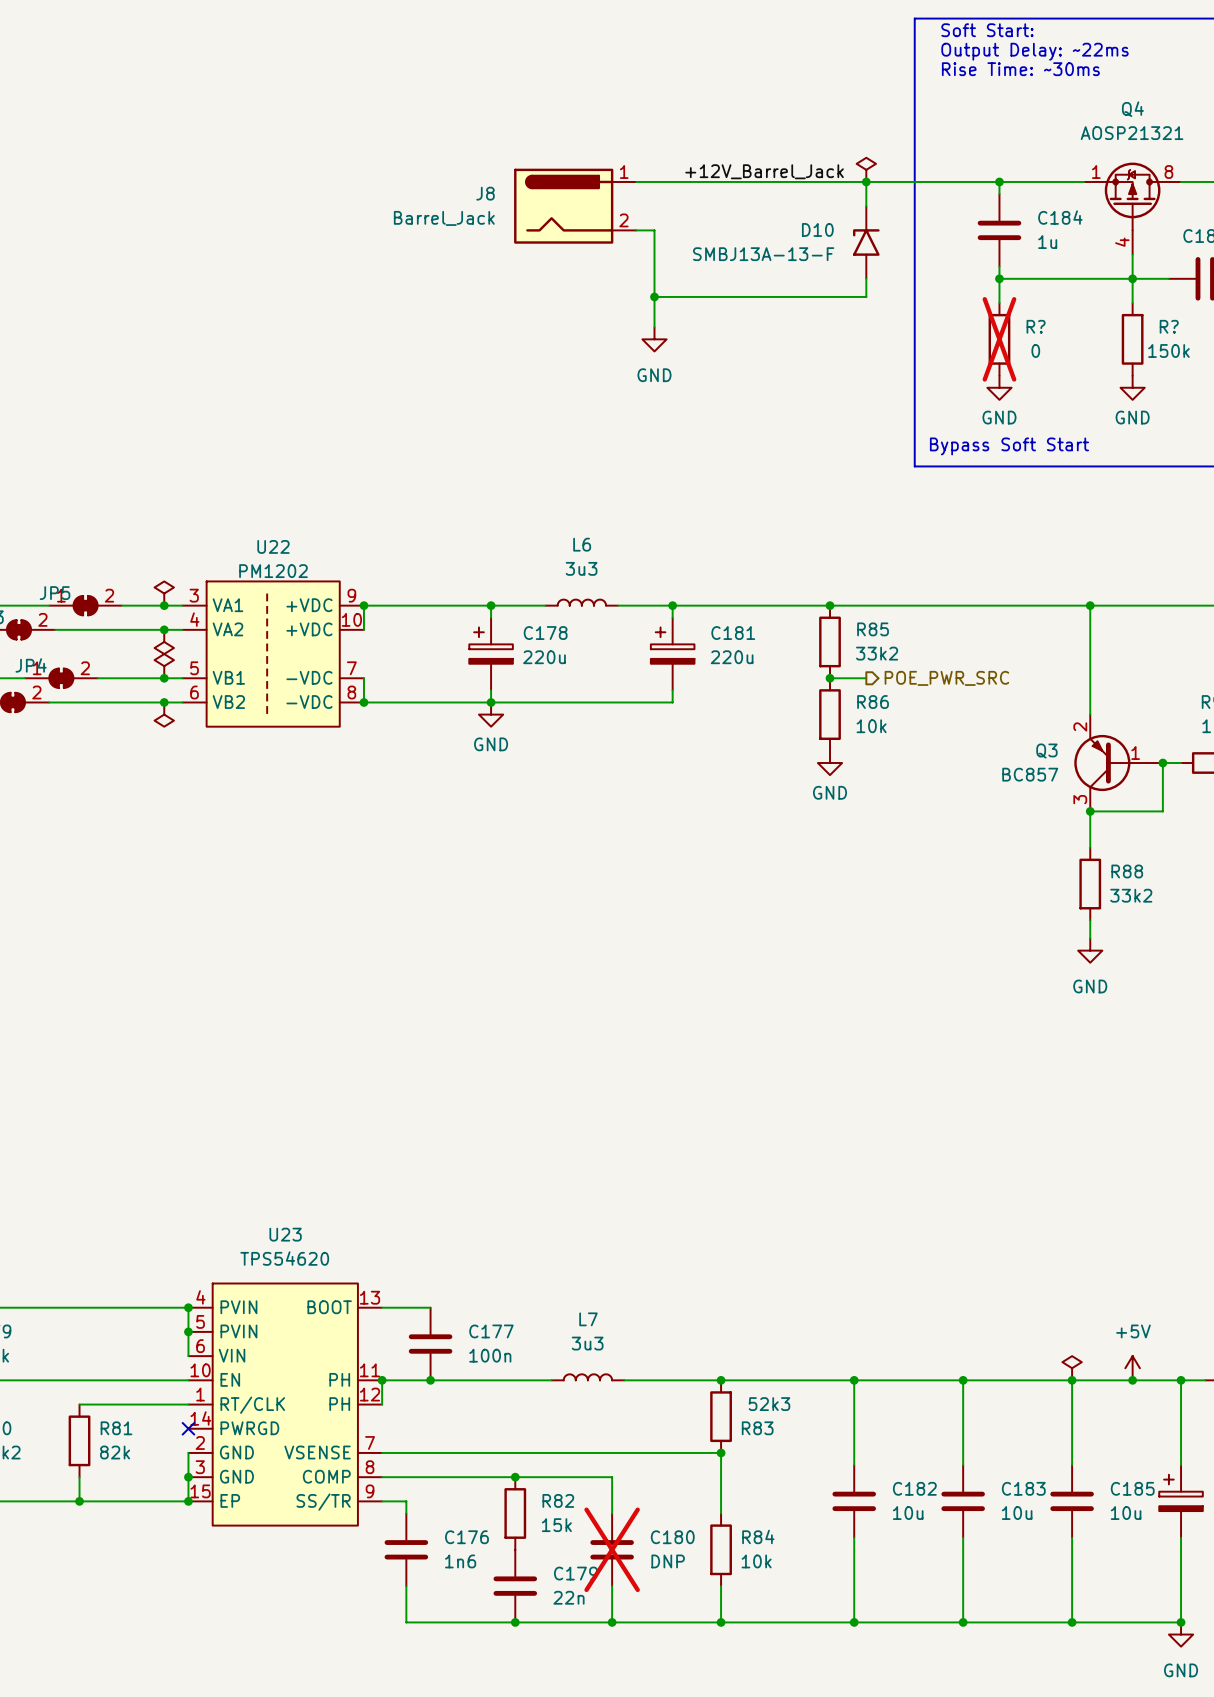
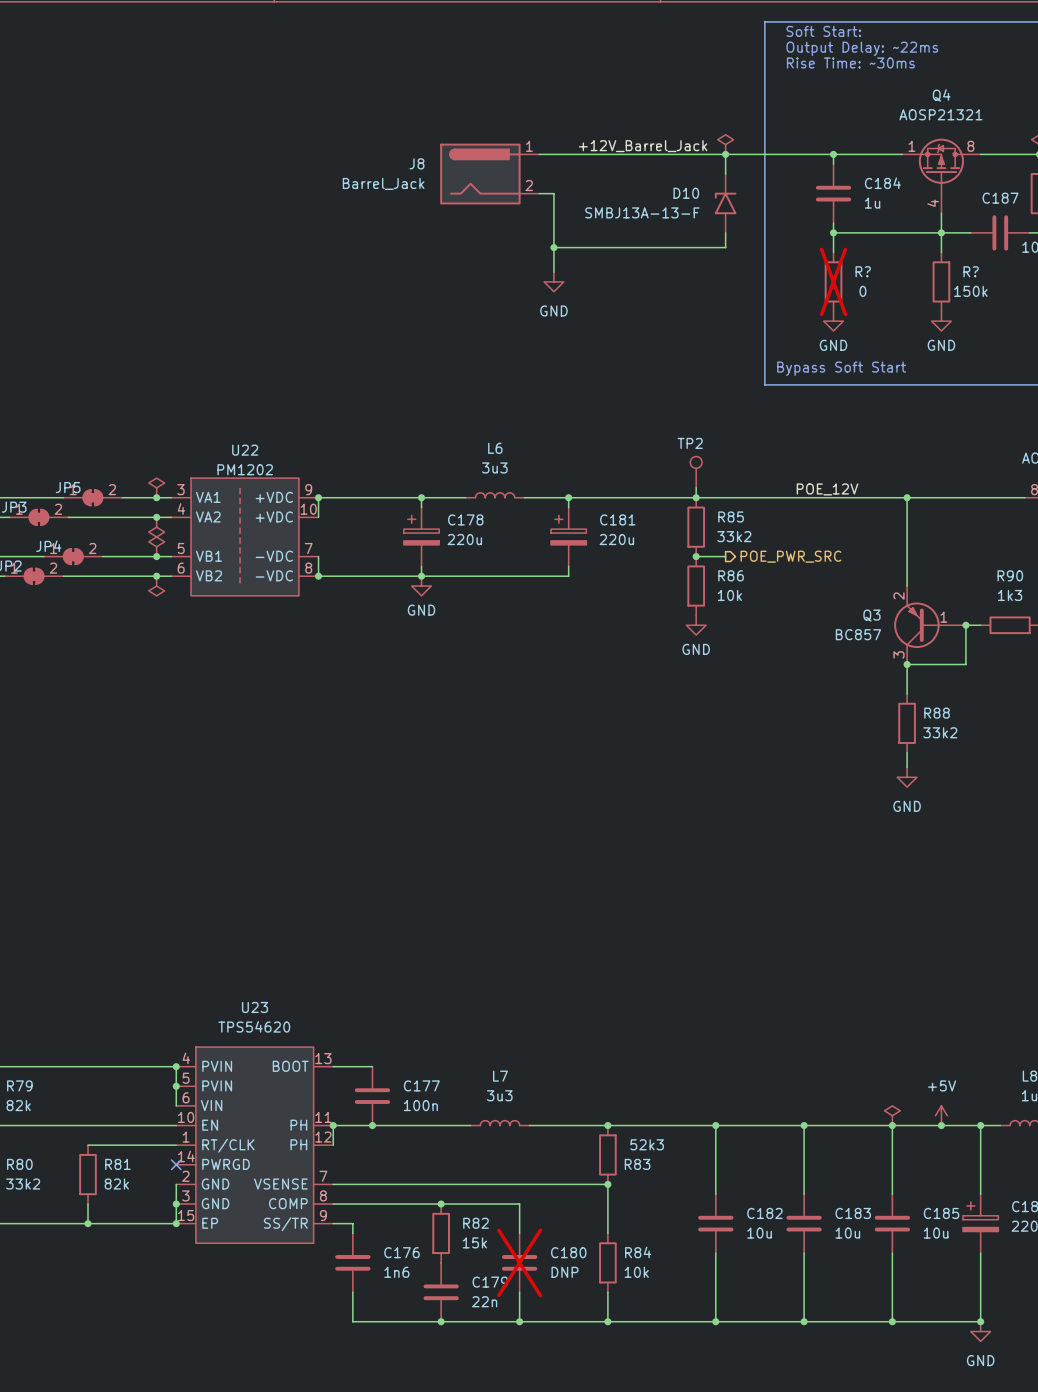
TP2: none -> (696, 472)
wire: none -> (696, 487) (696, 497)
label: none -> POE_12V (827, 489)

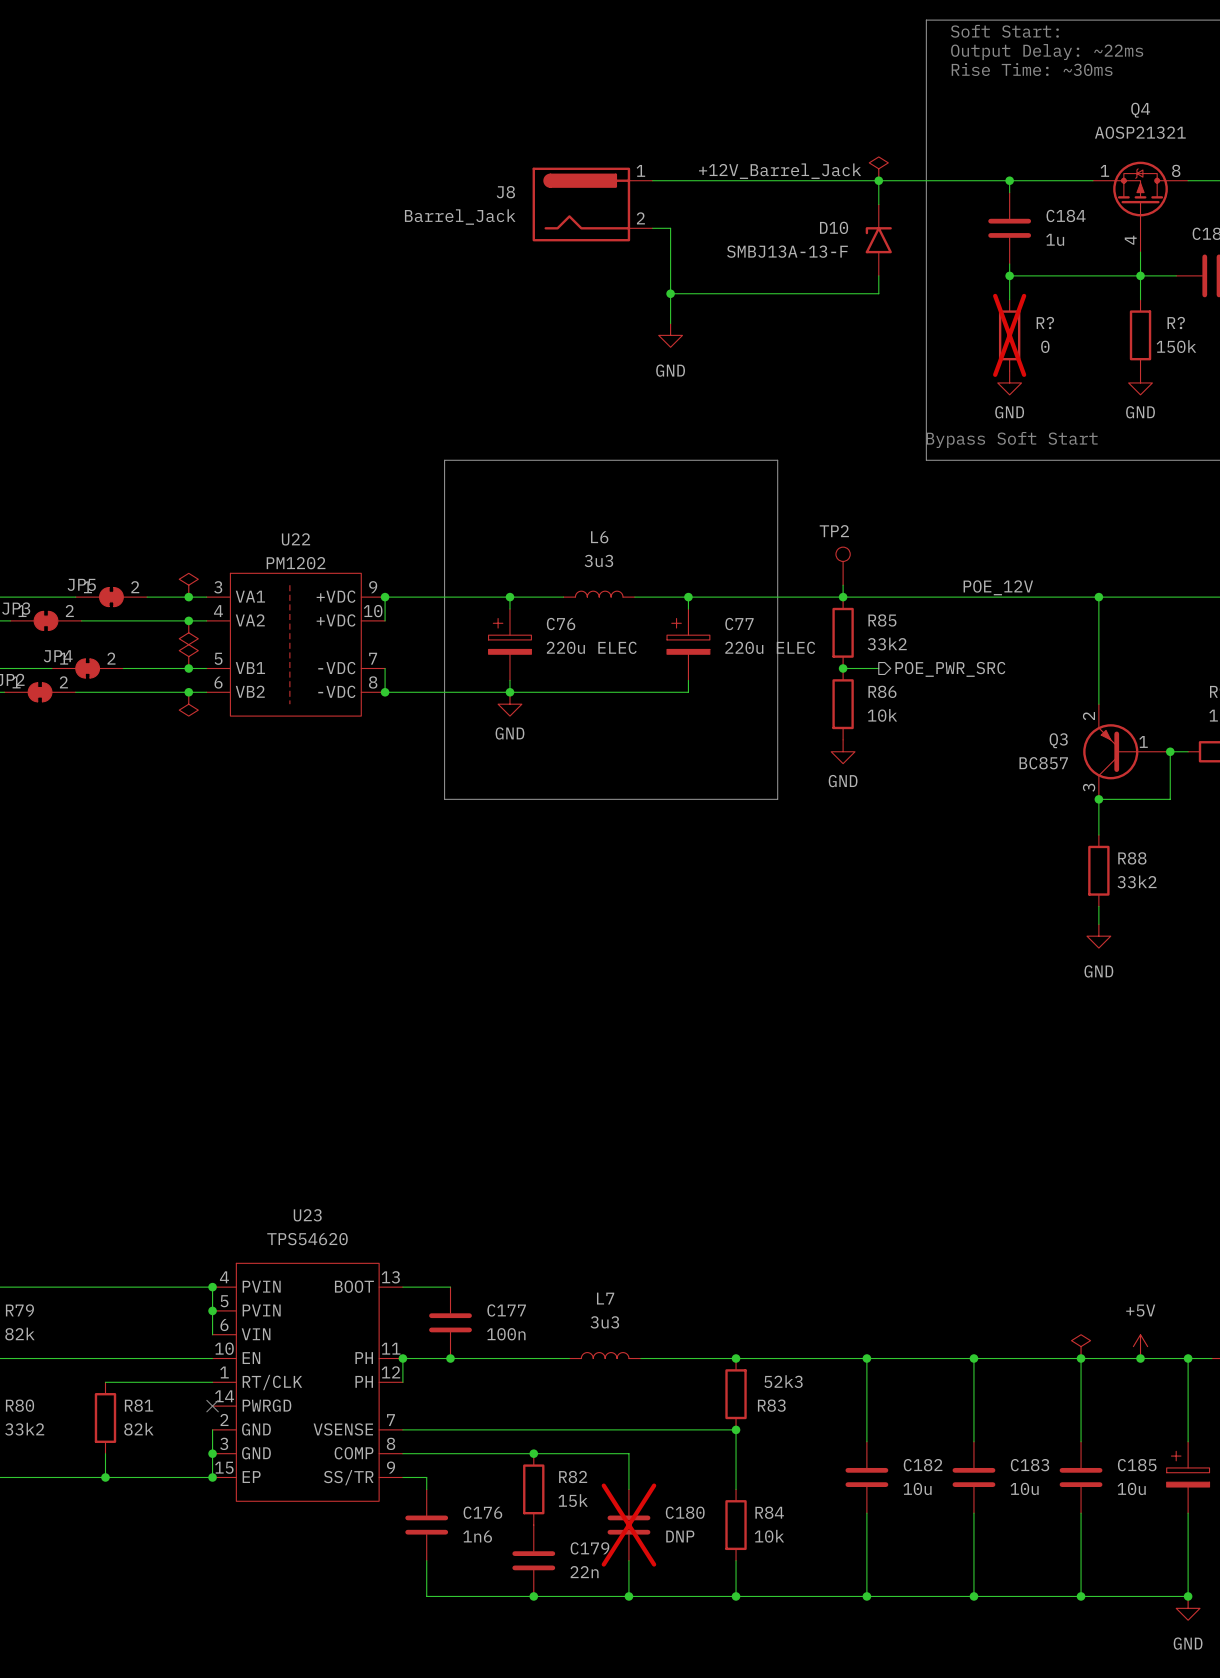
line: none -> (444, 460) (777, 460) (777, 799) (444, 799) (444, 460)
C178 name: C178 (465, 519) -> C76 (561, 624)
C181 name: C181 (617, 519) -> C77 (739, 624)
C178 value: 220u (464, 539) -> 220u ELEC (591, 647)
C181 value: 220u (616, 539) -> 220u ELEC (770, 647)

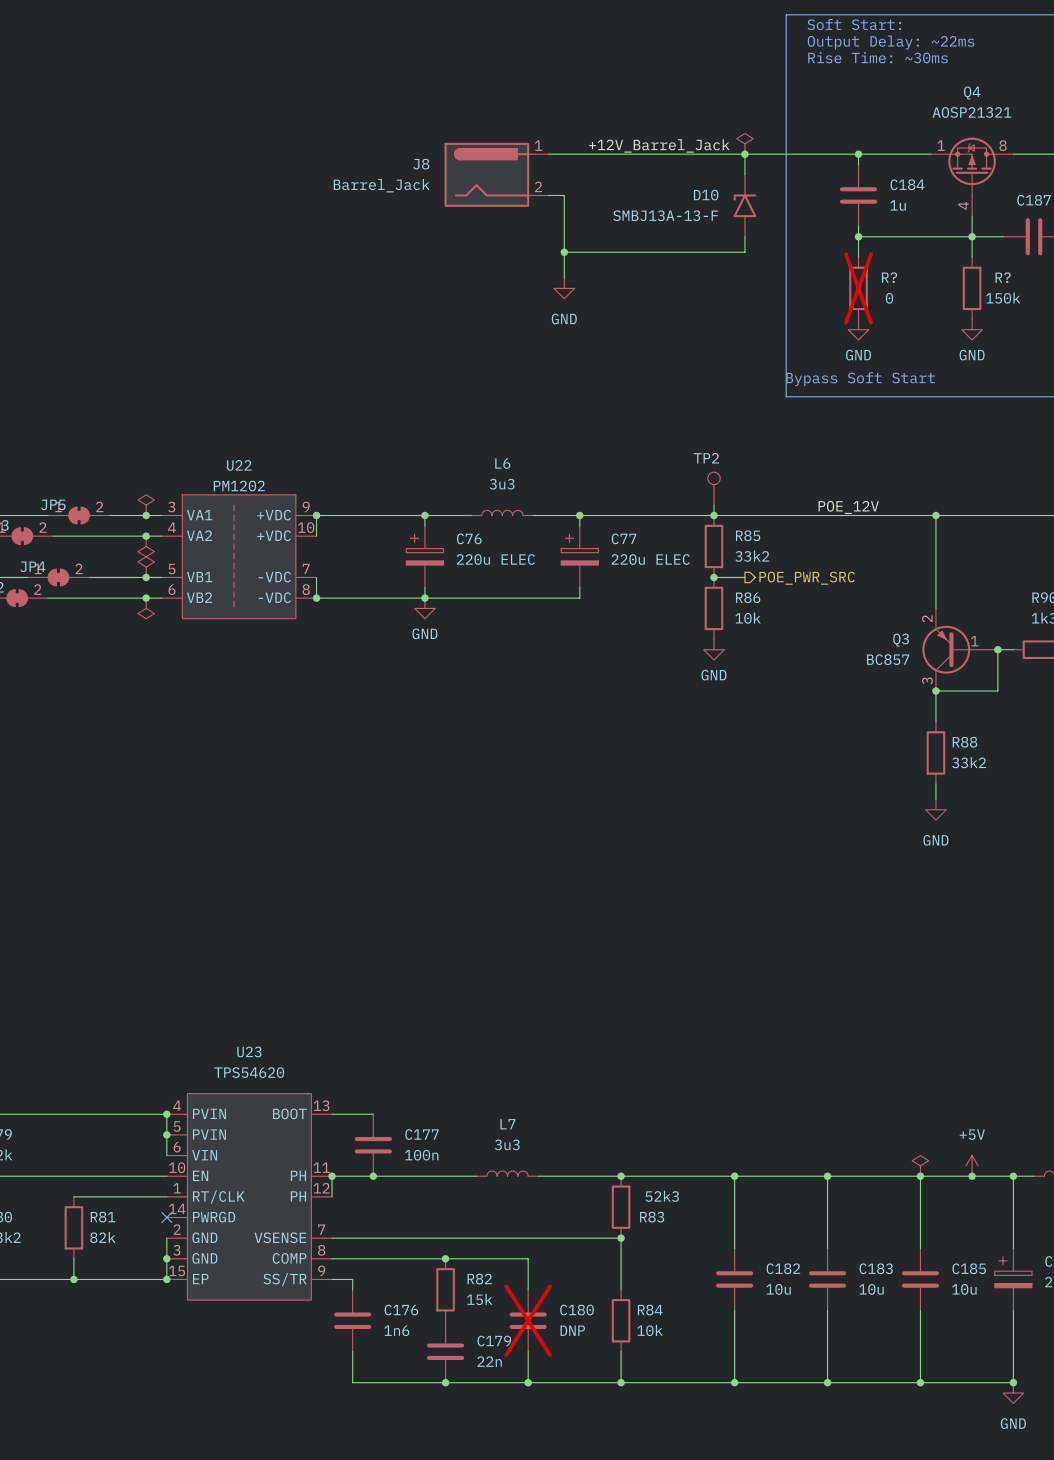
line: (444, 460) (777, 460) (777, 799) (444, 799) (444, 460) -> none

